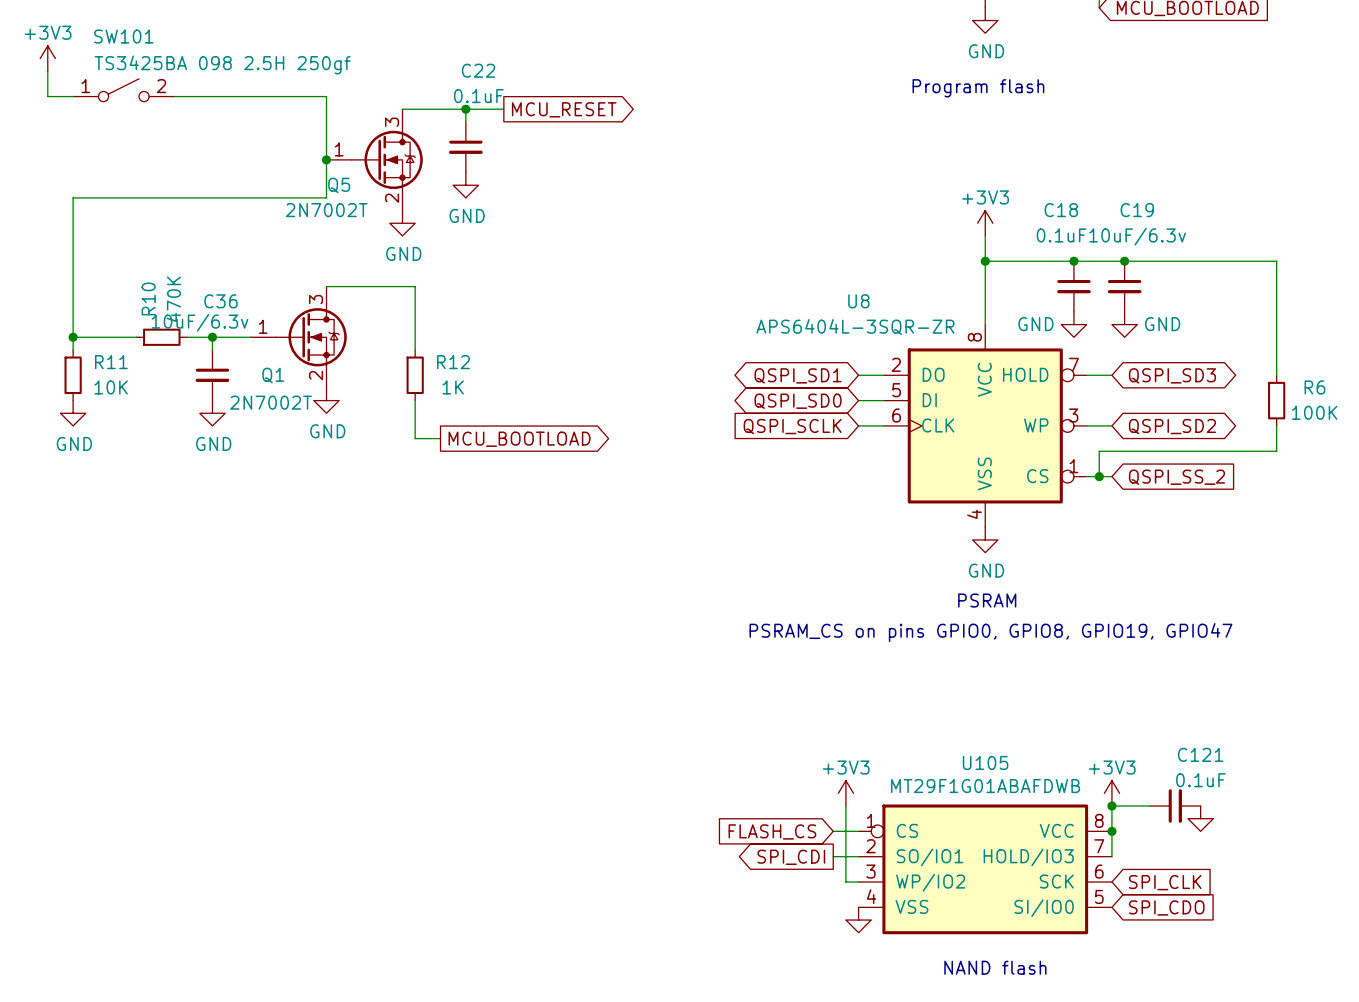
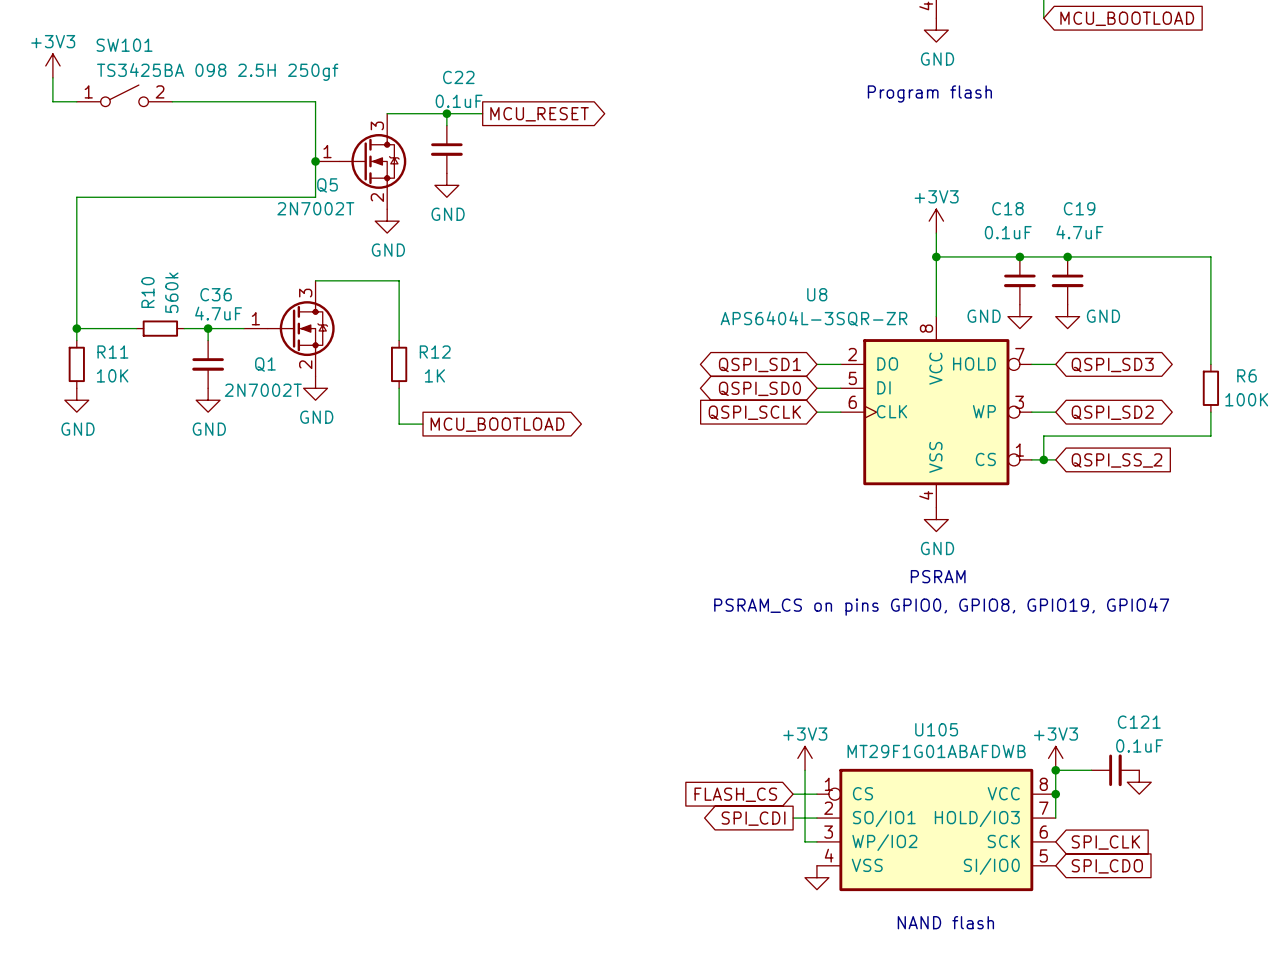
C19 value: 10uF/6.3v (1137, 236) -> 4.7uF (1079, 232)
R10 value: 470K (173, 299) -> 560k (171, 292)
C36 value: 10uF/6.3v (200, 322) -> 4.7uF (218, 313)

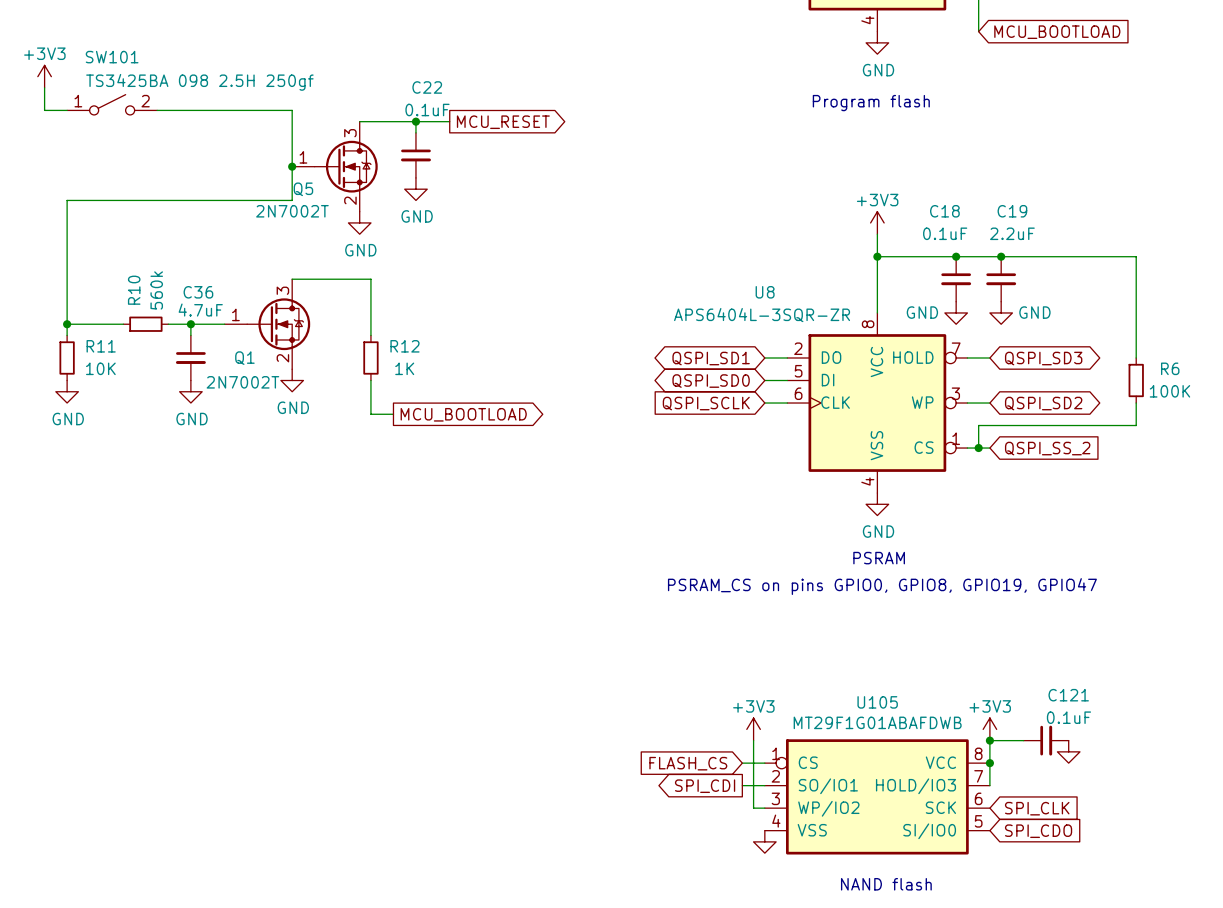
C19 value: 4.7uF (1079, 232) -> 2.2uF (1012, 233)

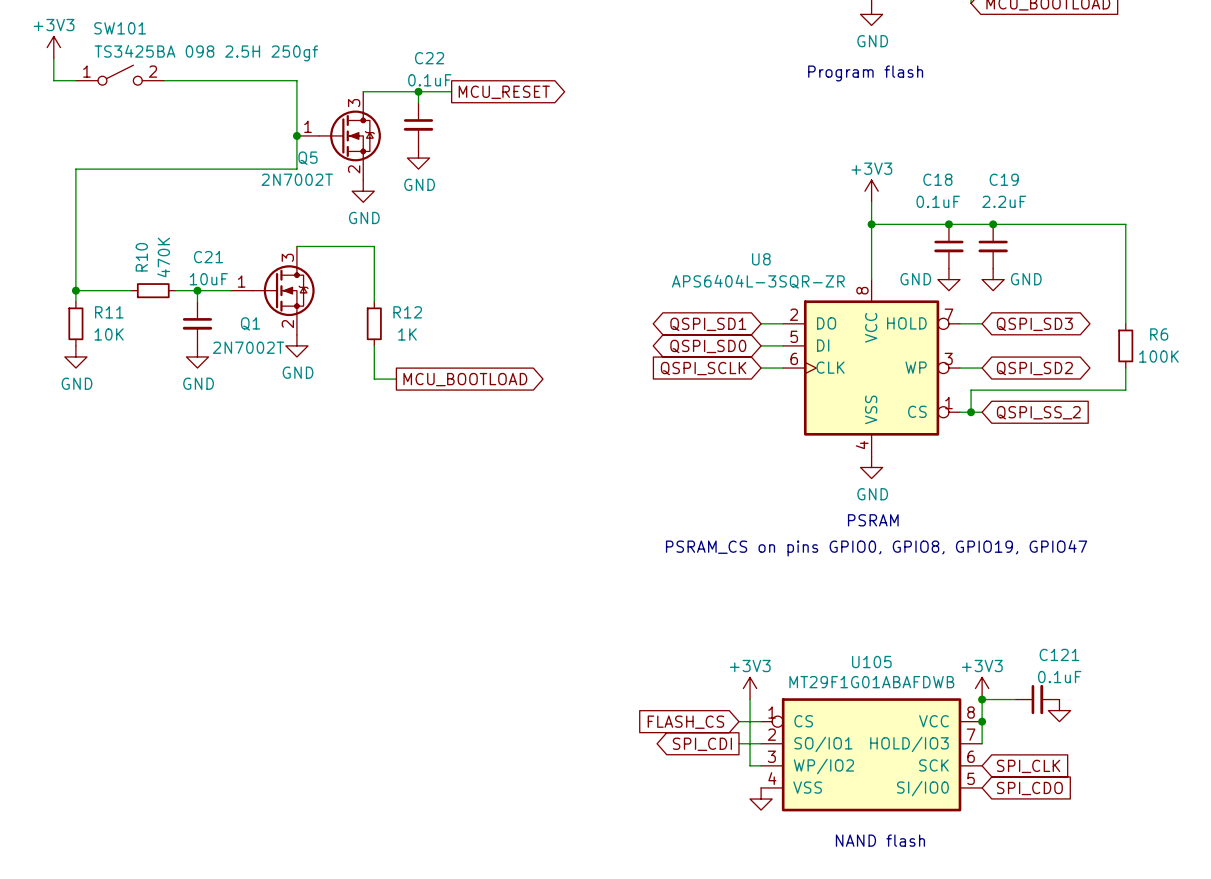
R10 value: 560k (156, 290) -> 470K (163, 257)
C36 name: C36 (198, 292) -> C21 (208, 257)
C36 value: 4.7uF (200, 310) -> 10uF (208, 279)

